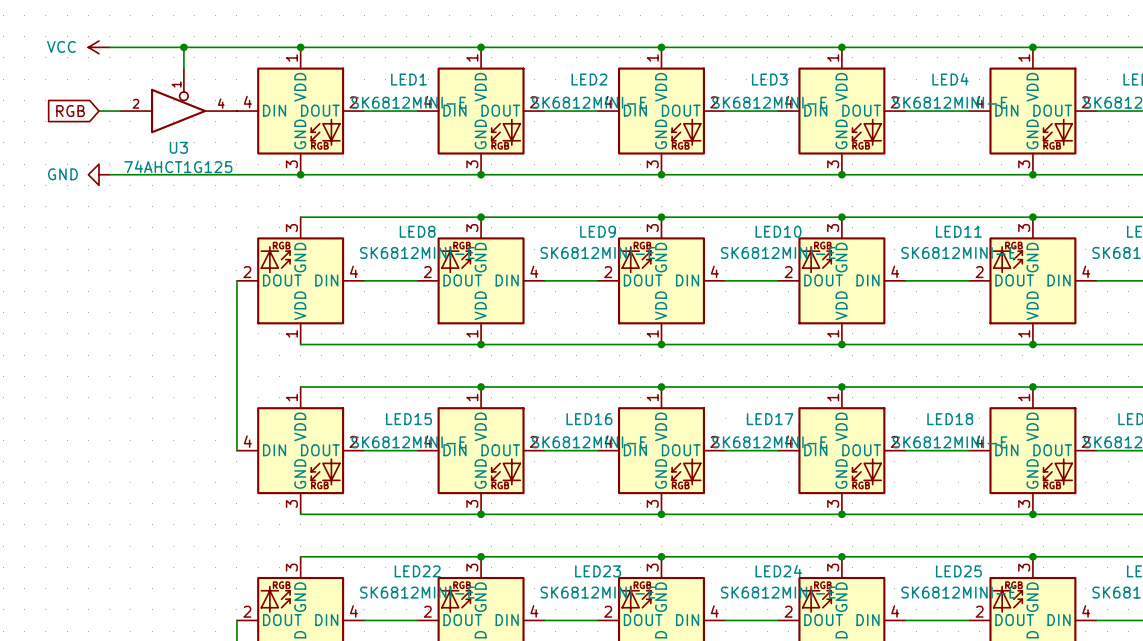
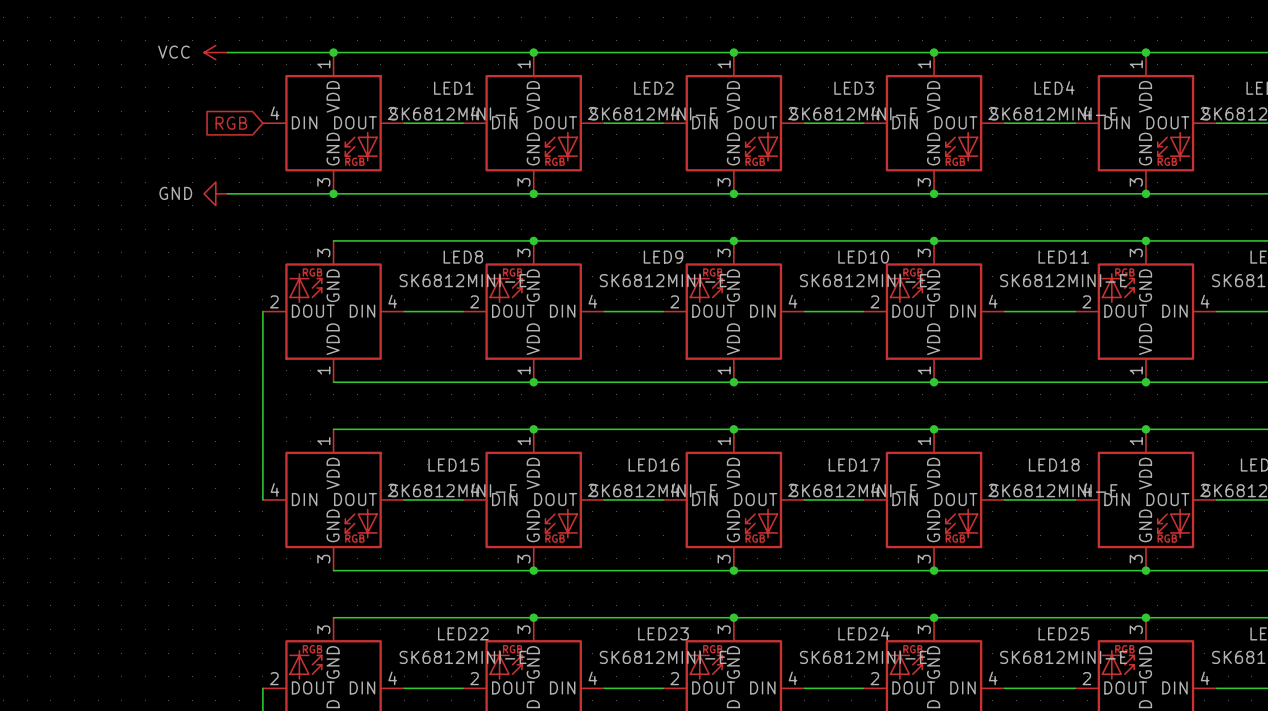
power symbol text position: VCC (61, 46) -> VCC (173, 52)
power symbol position: VCC (99, 47) -> VCC (215, 52)
wire: (109, 47) (205, 47) -> none
wire: (183, 47) (183, 68) -> none
junction: (183, 47) -> none
U3: 74AHCT1G125 (178, 100) -> none
global label position: RGB (70, 111) -> RGB (231, 123)
wire: (99, 111) (120, 111) -> none
power symbol position: GND (99, 174) -> GND (215, 193)
wire: (109, 174) (205, 174) -> none

